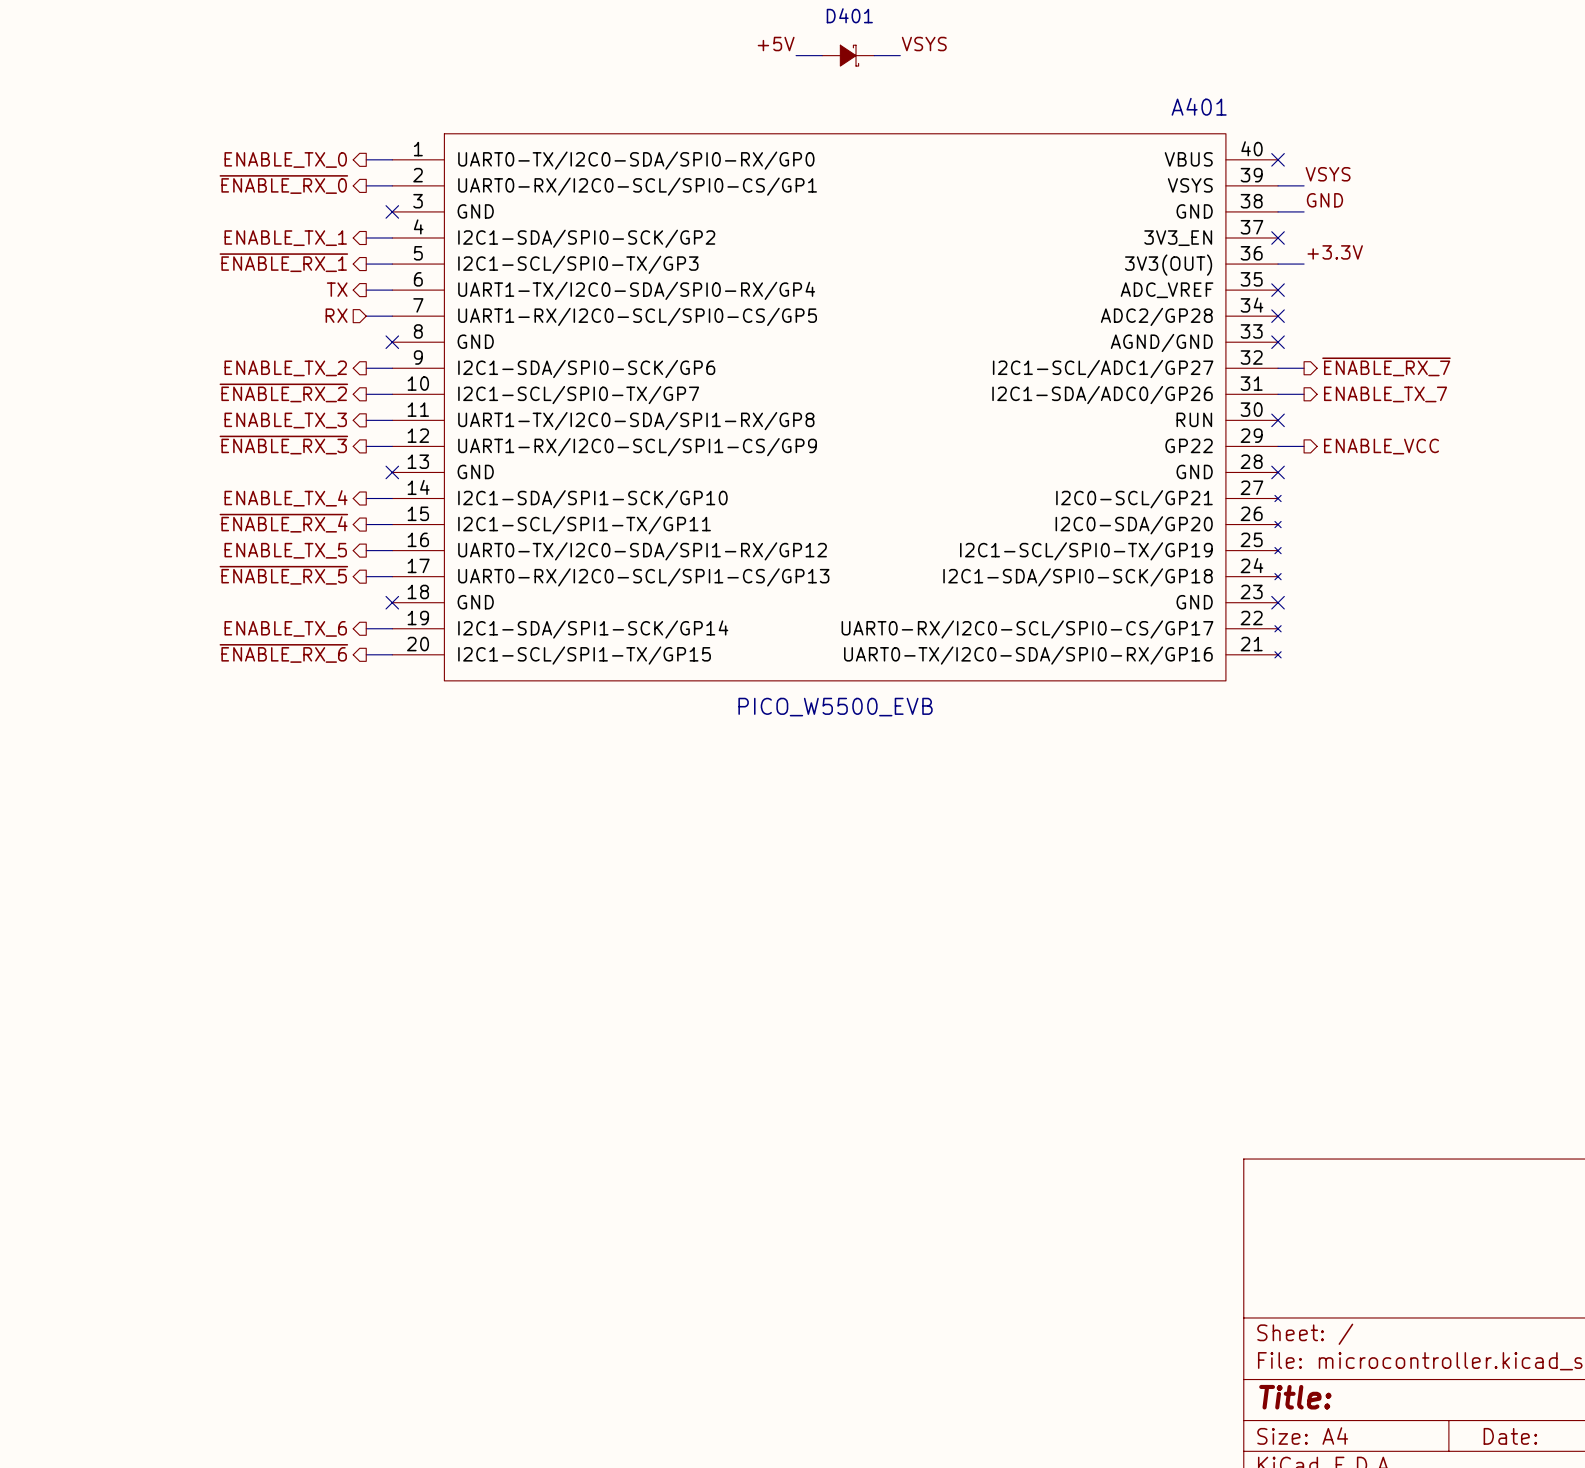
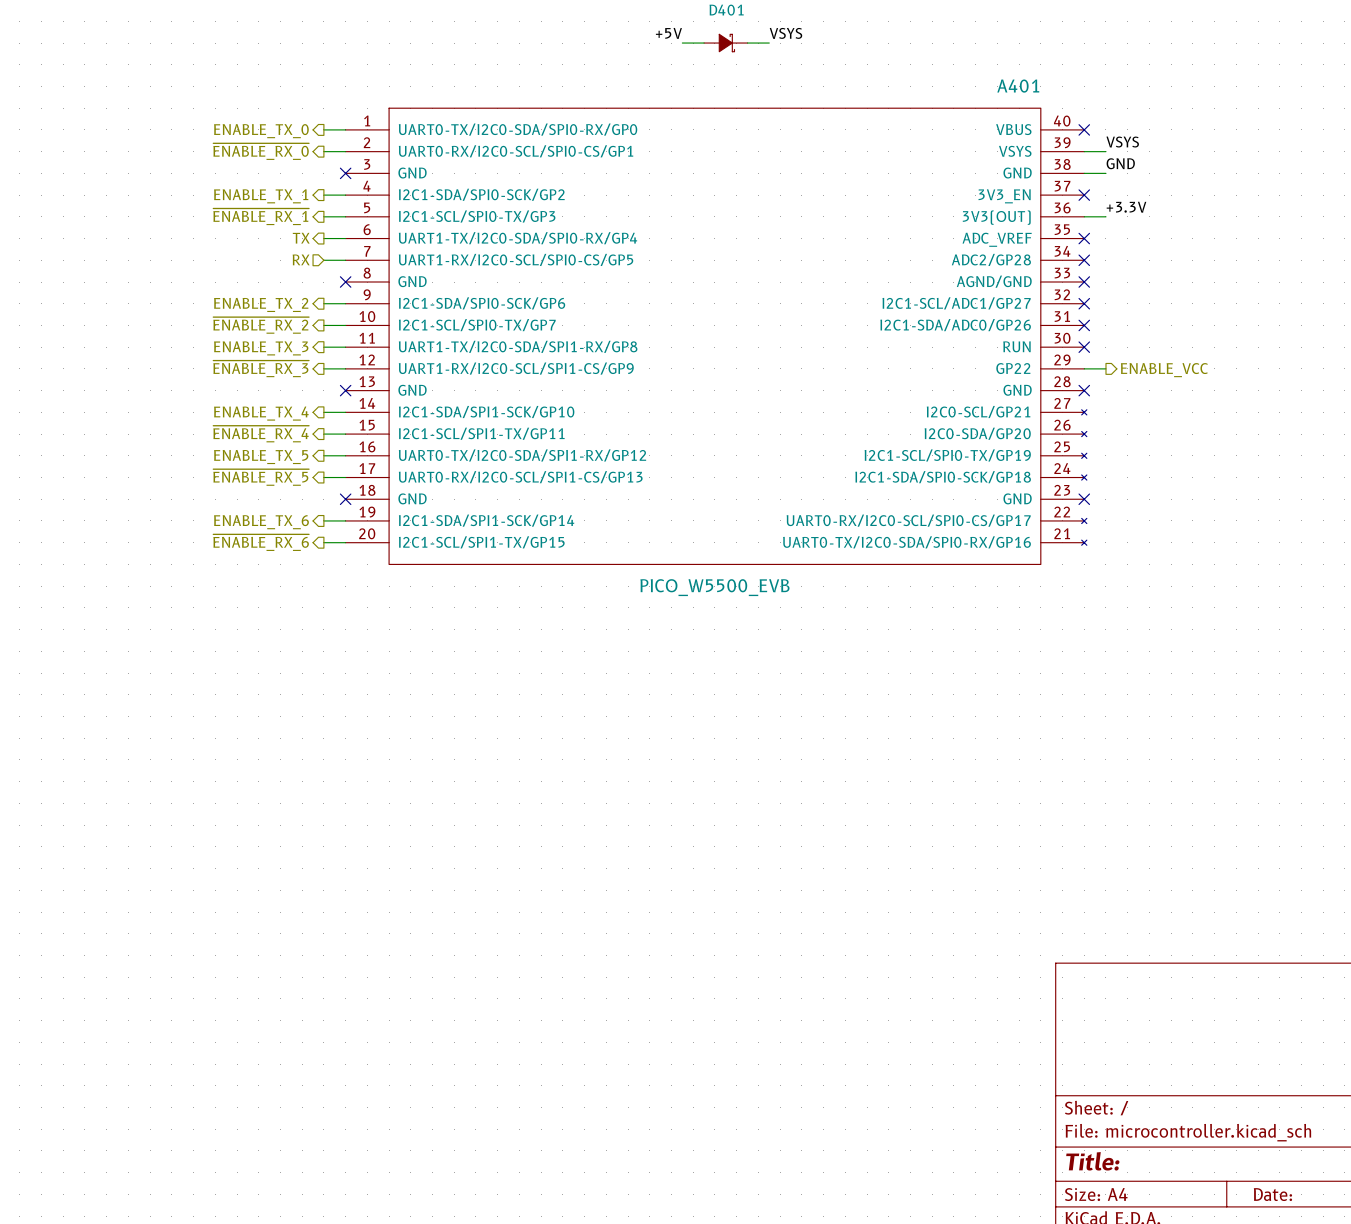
hierarchical label: ~{ENABLE_RX_7} (1386, 366) -> none
wire: (1278, 368) (1304, 368) -> none
no-connect mark: none -> (1084, 303)
wire: (1278, 394) (1304, 394) -> none
no-connect mark: none -> (1084, 325)
hierarchical label: ENABLE_TX_7 (1385, 394) -> none

